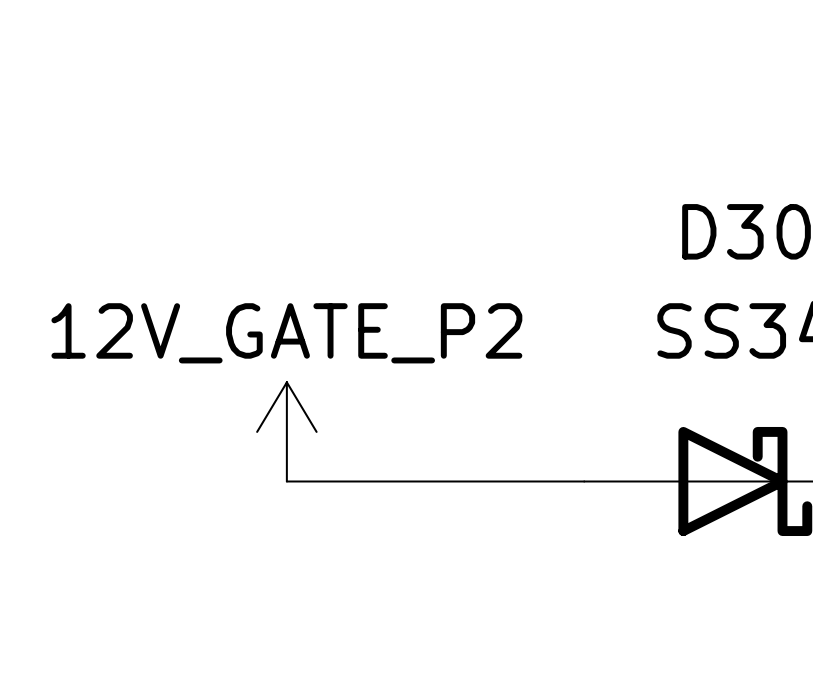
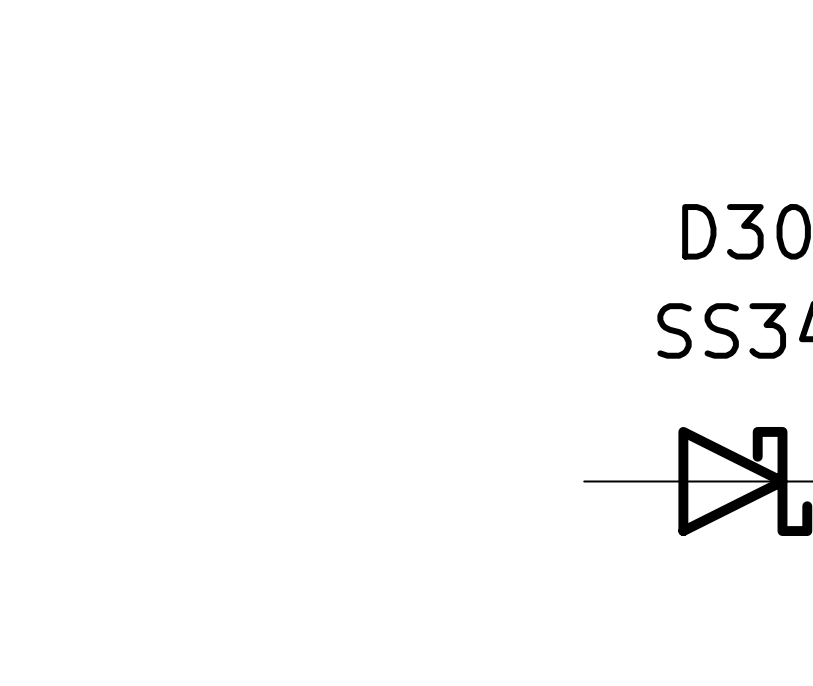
power symbol: 12V_GATE_P2 (286, 431) -> none
wire: (286, 481) (584, 481) -> none

